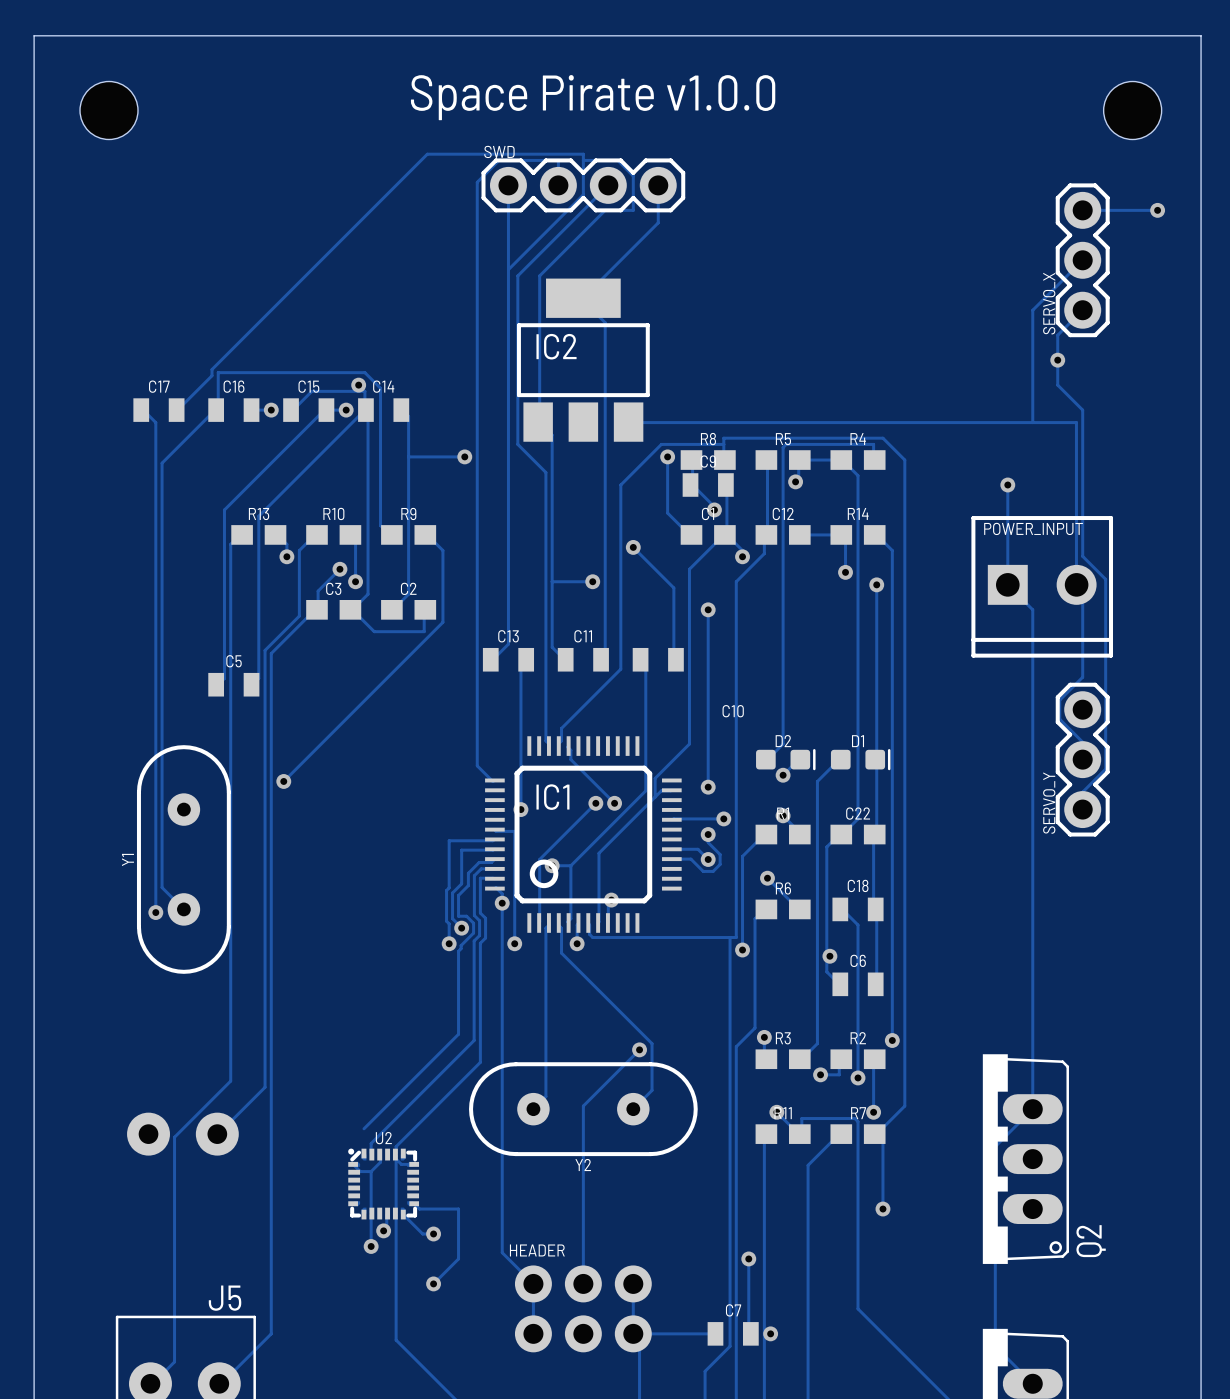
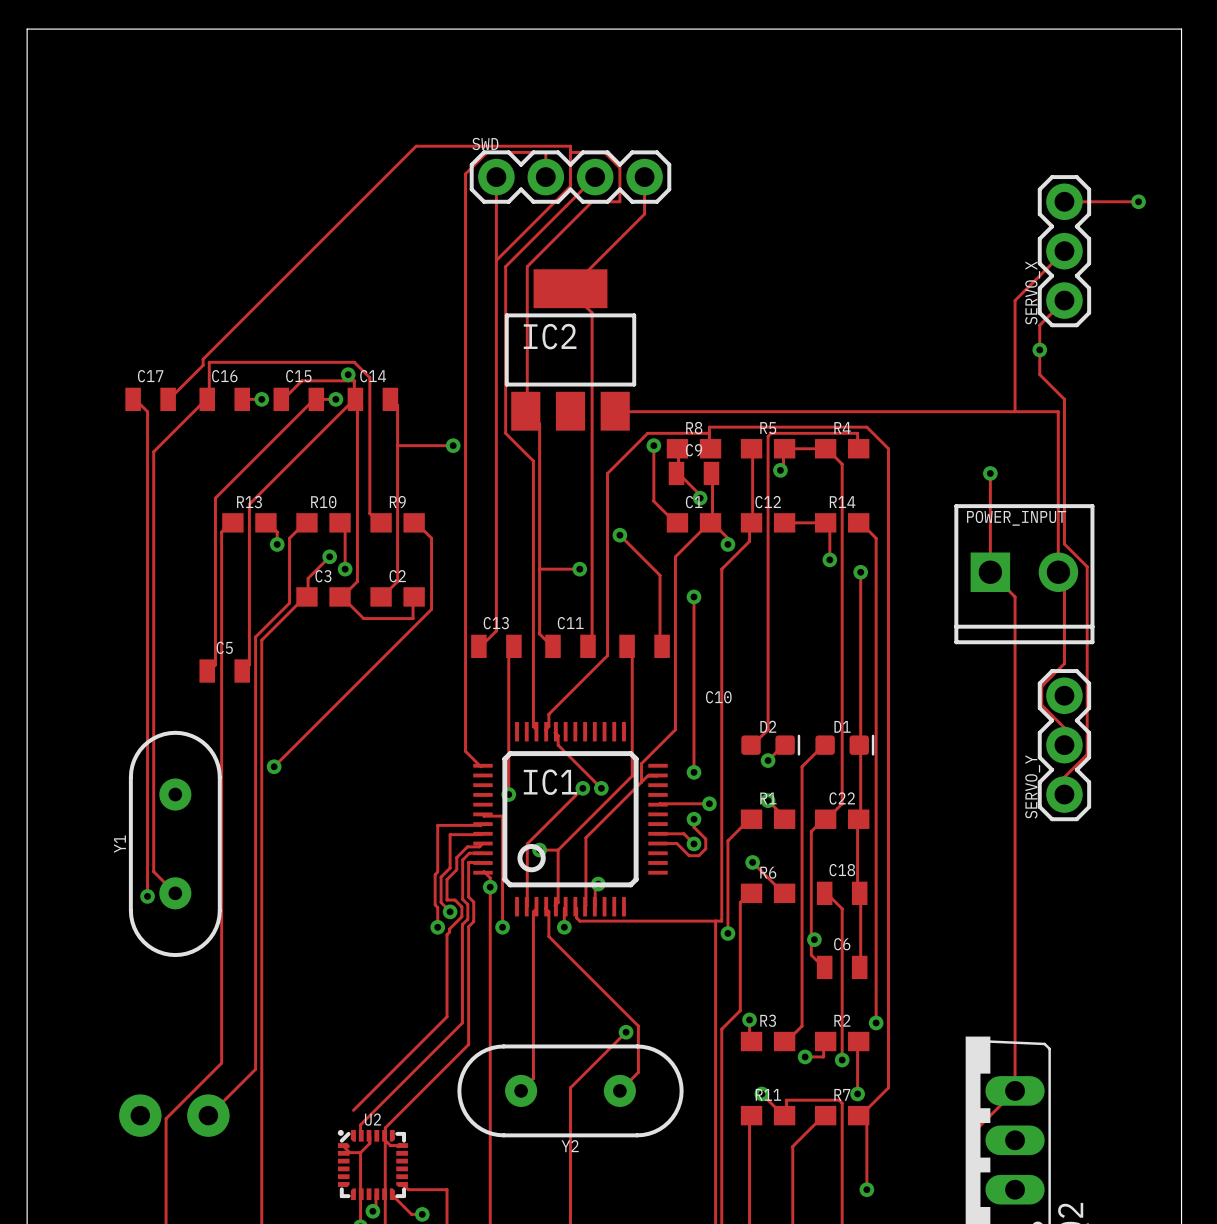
text: Space Pirate v1.0.0 (593, 97) -> none
hole: (109, 110) -> none
hole: (1132, 110) -> none

